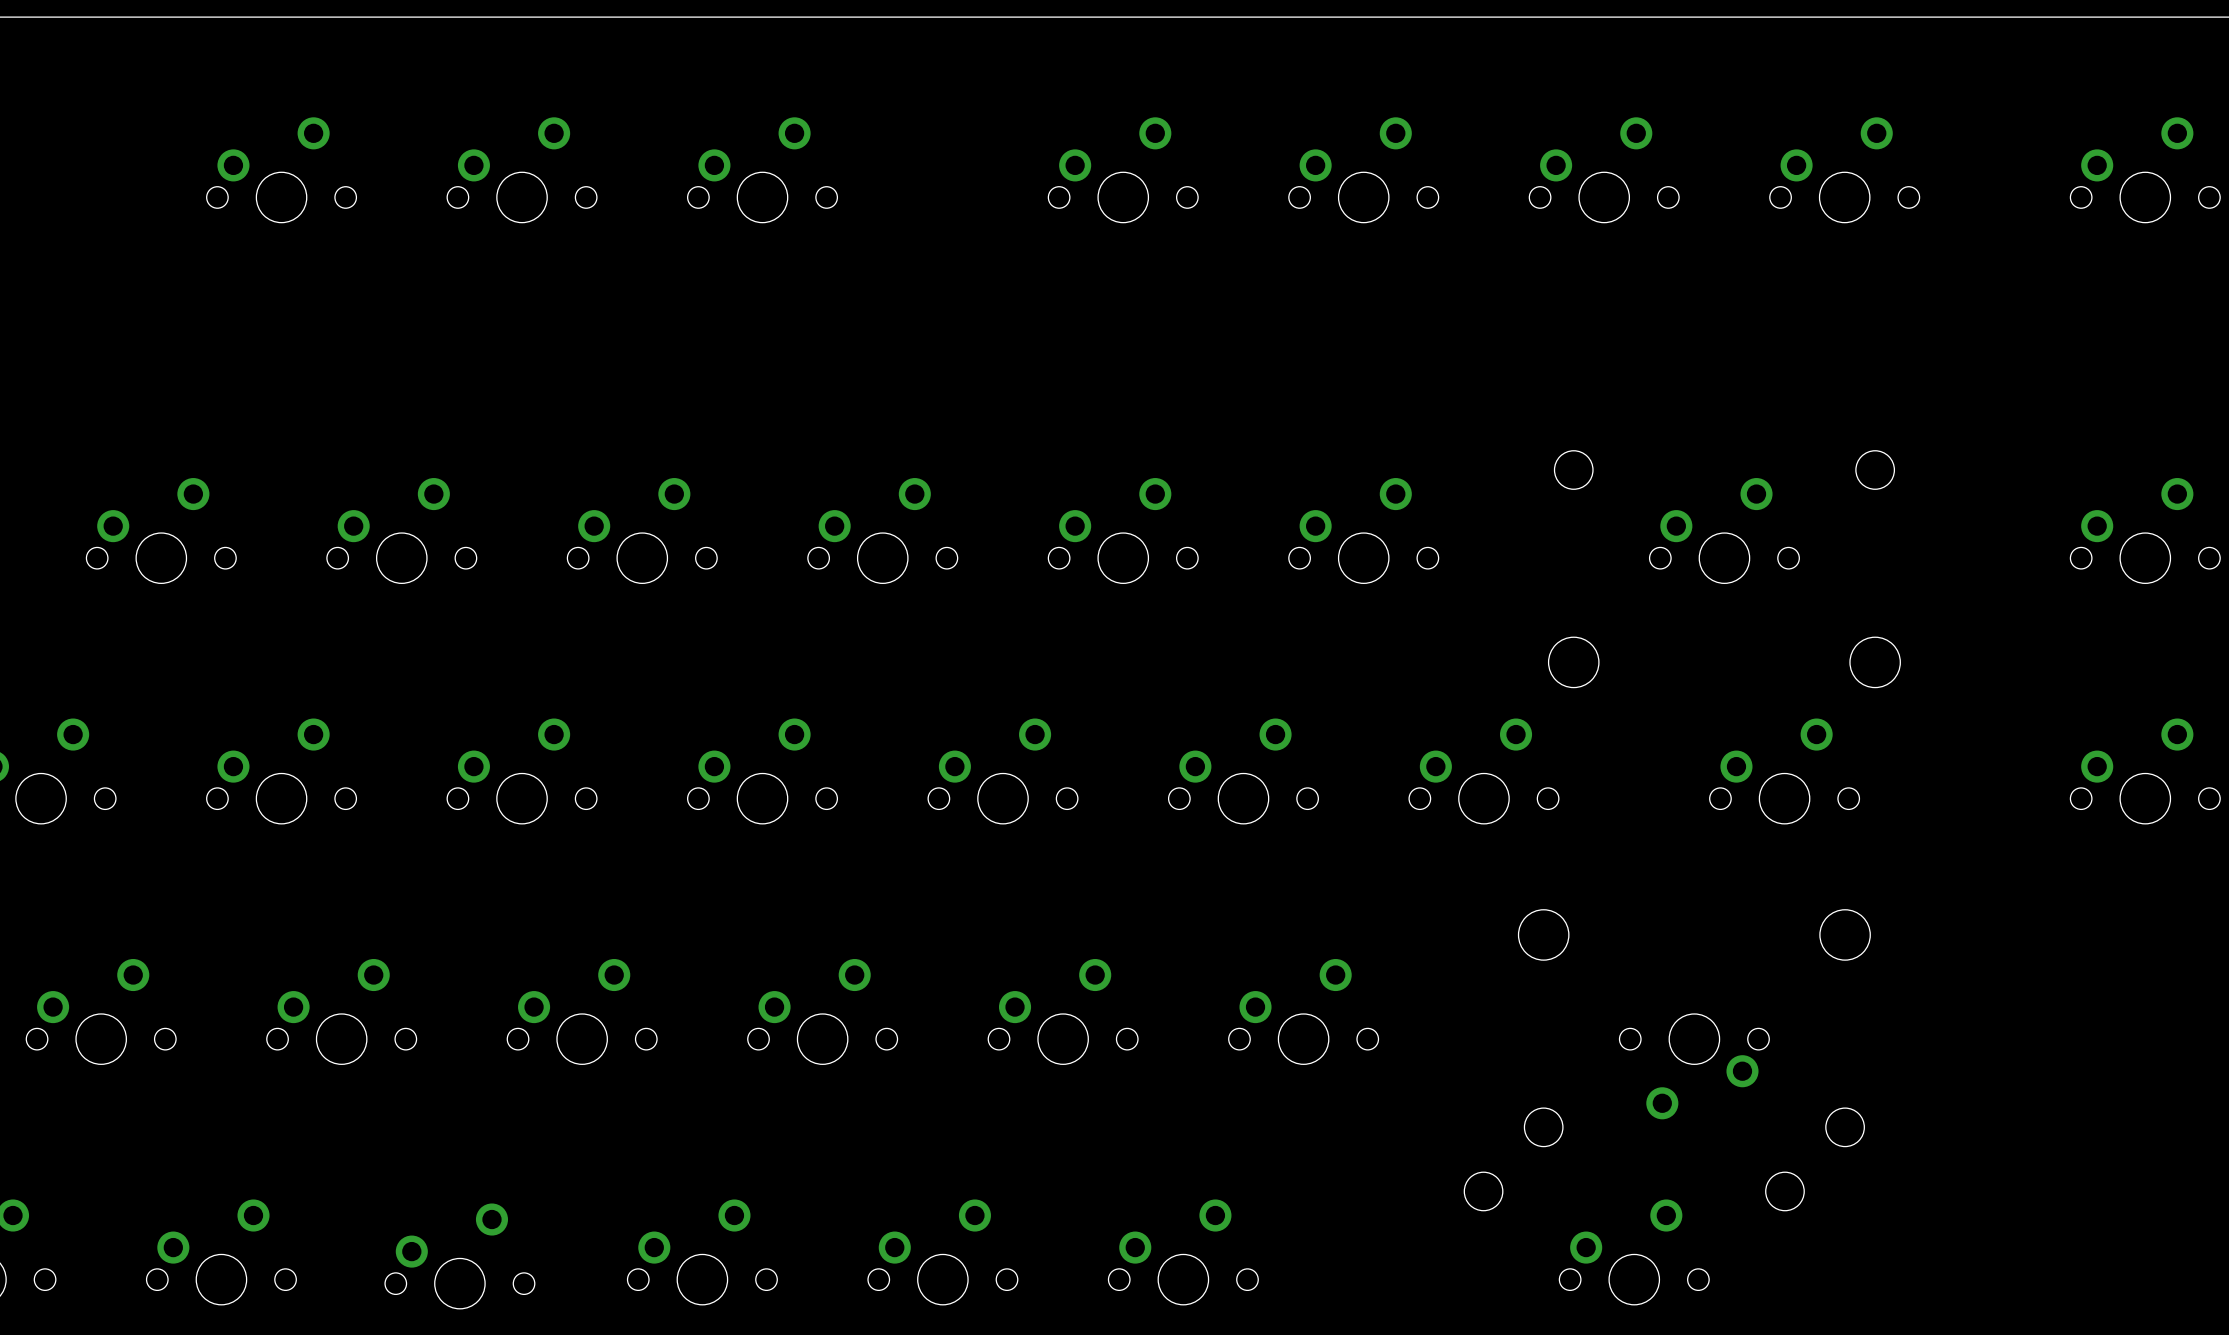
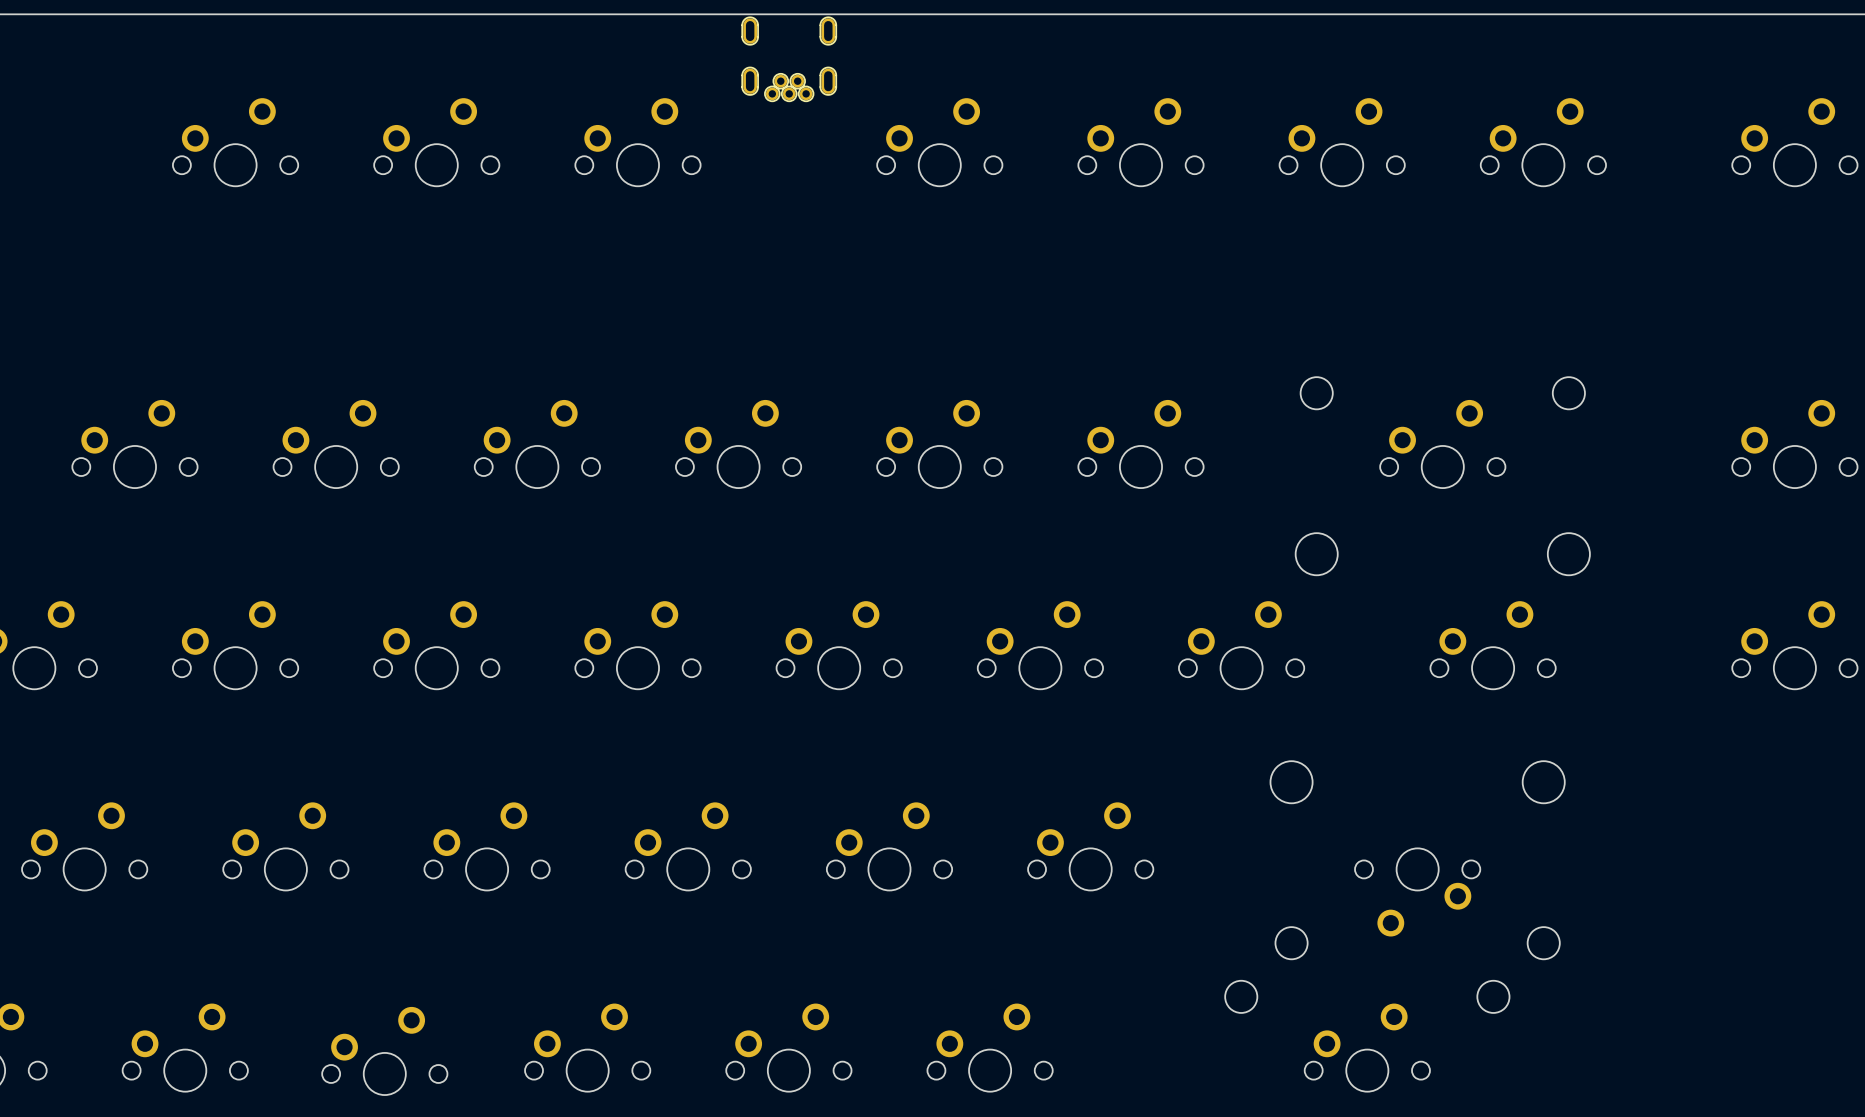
part: none -> (789, 59)

